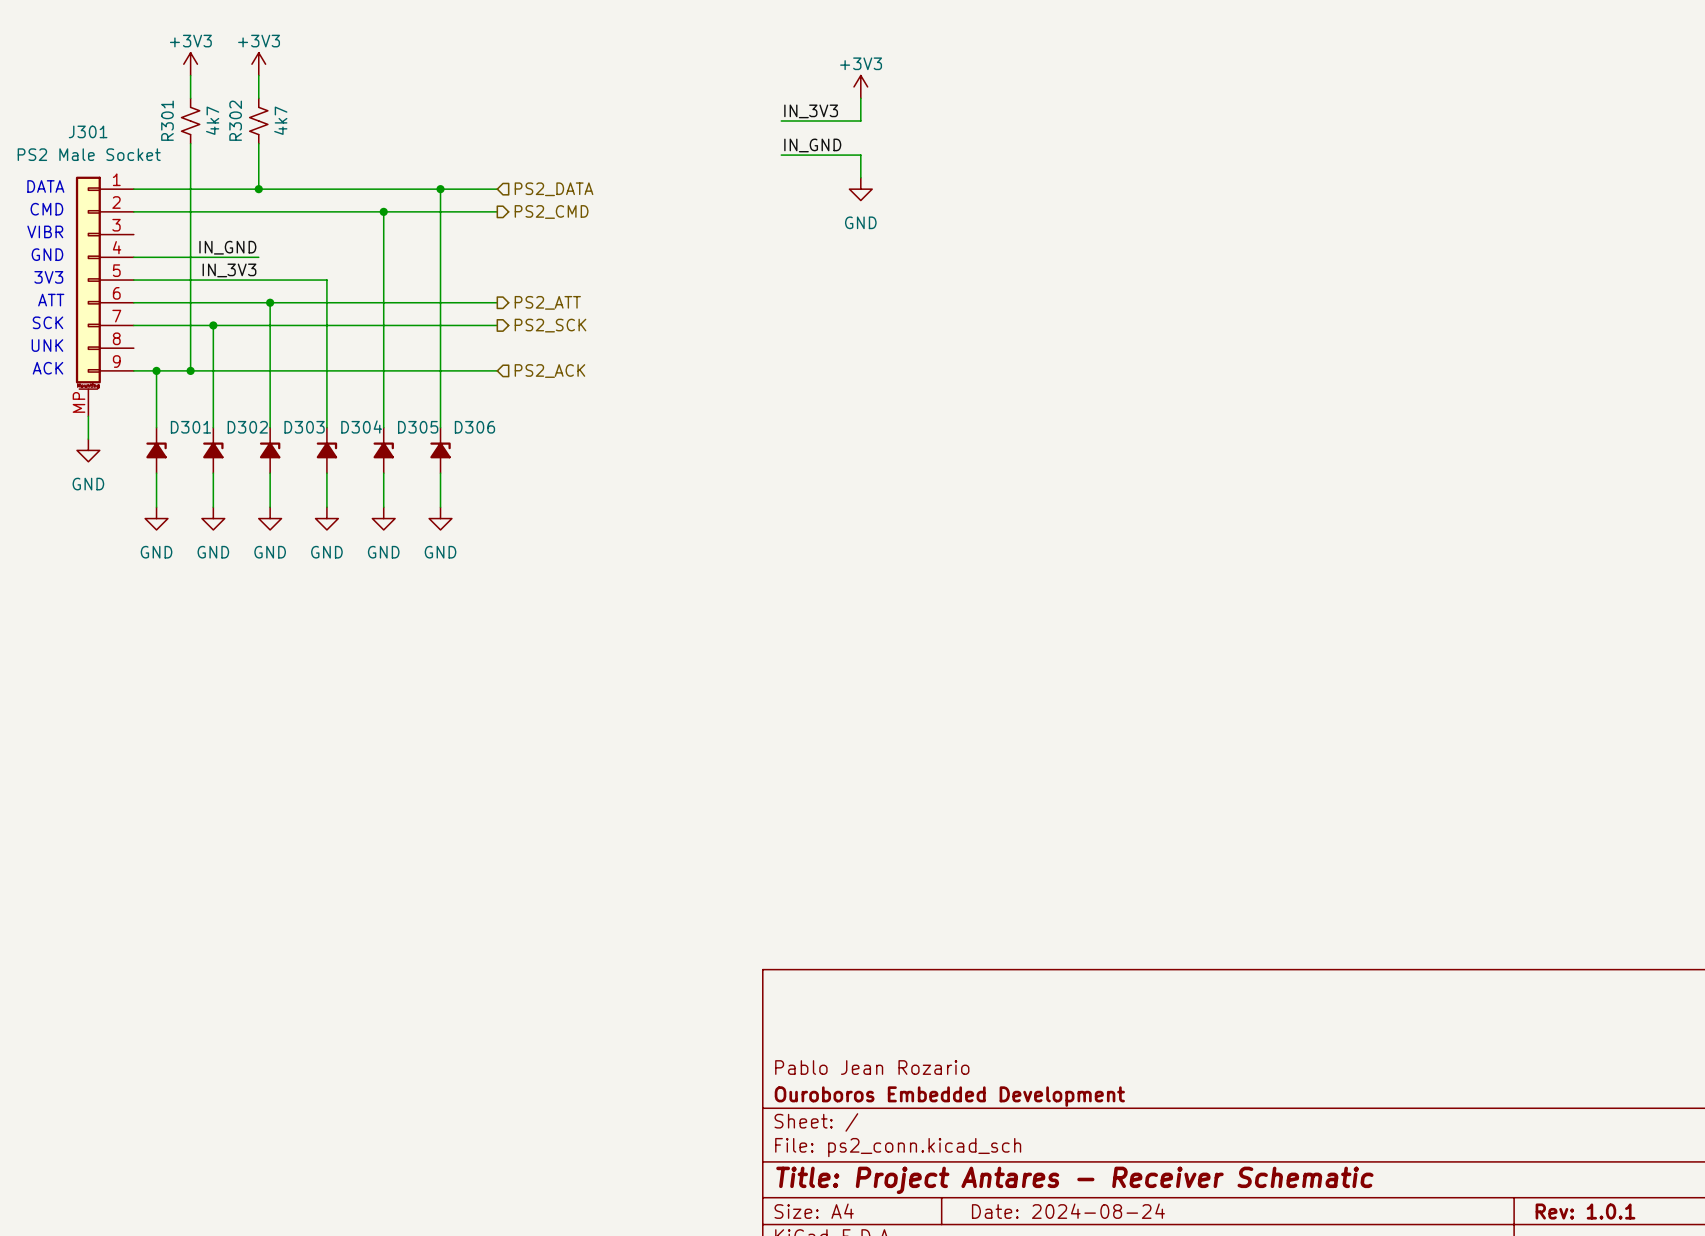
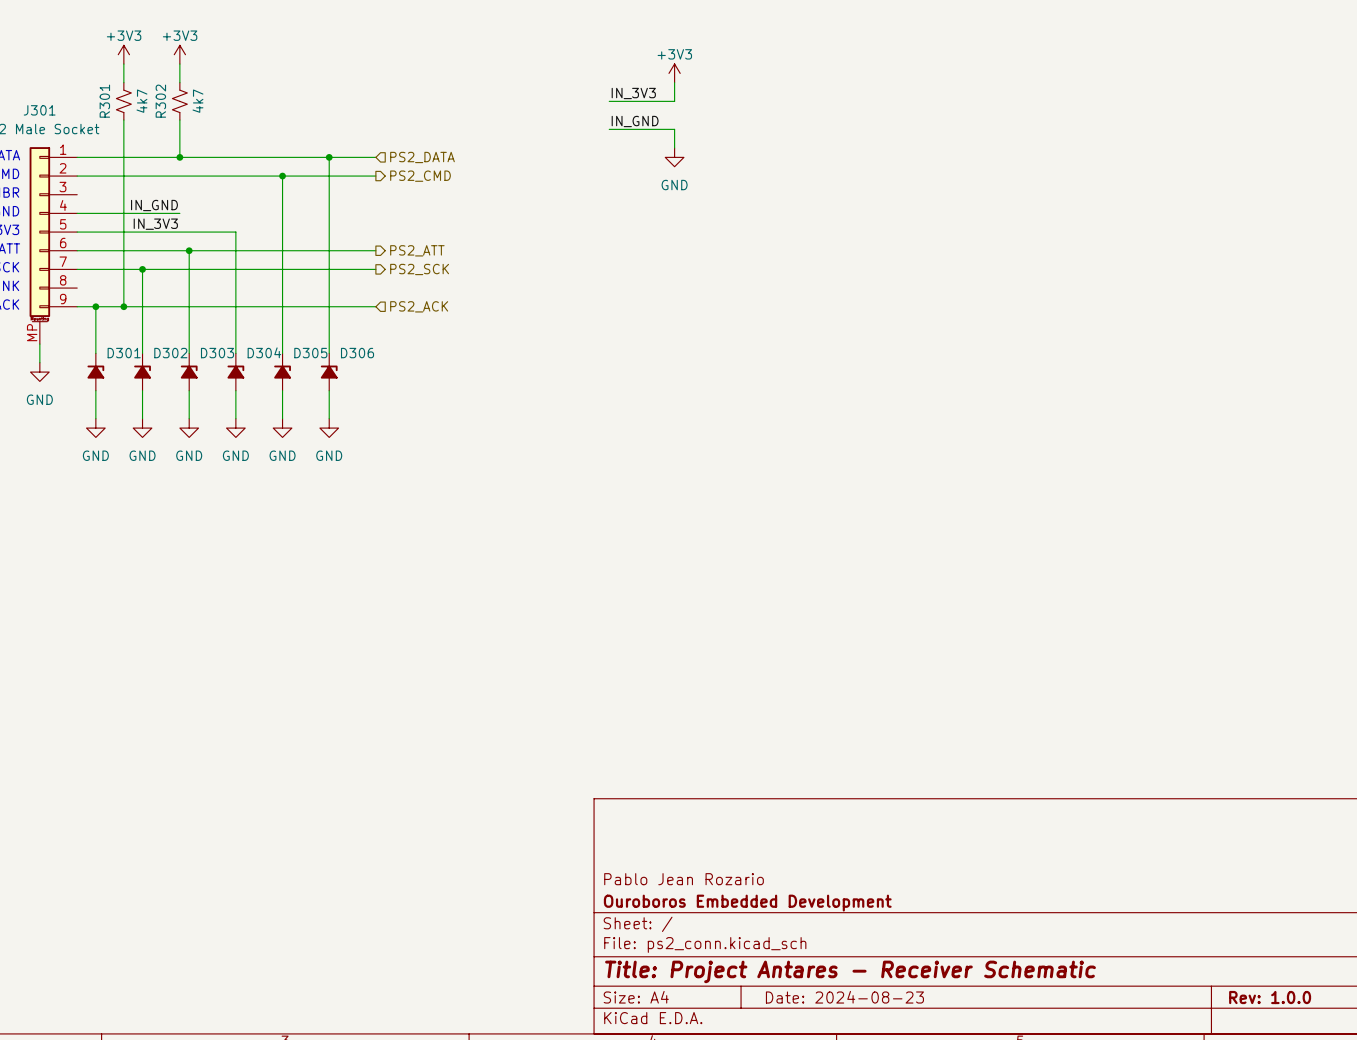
title block: Date: 2024-08-24 (1068, 1211) -> Date: 2024-08-23 (844, 997)
title block: Rev: 1.0.1 (1585, 1211) -> Rev: 1.0.0 (1270, 997)

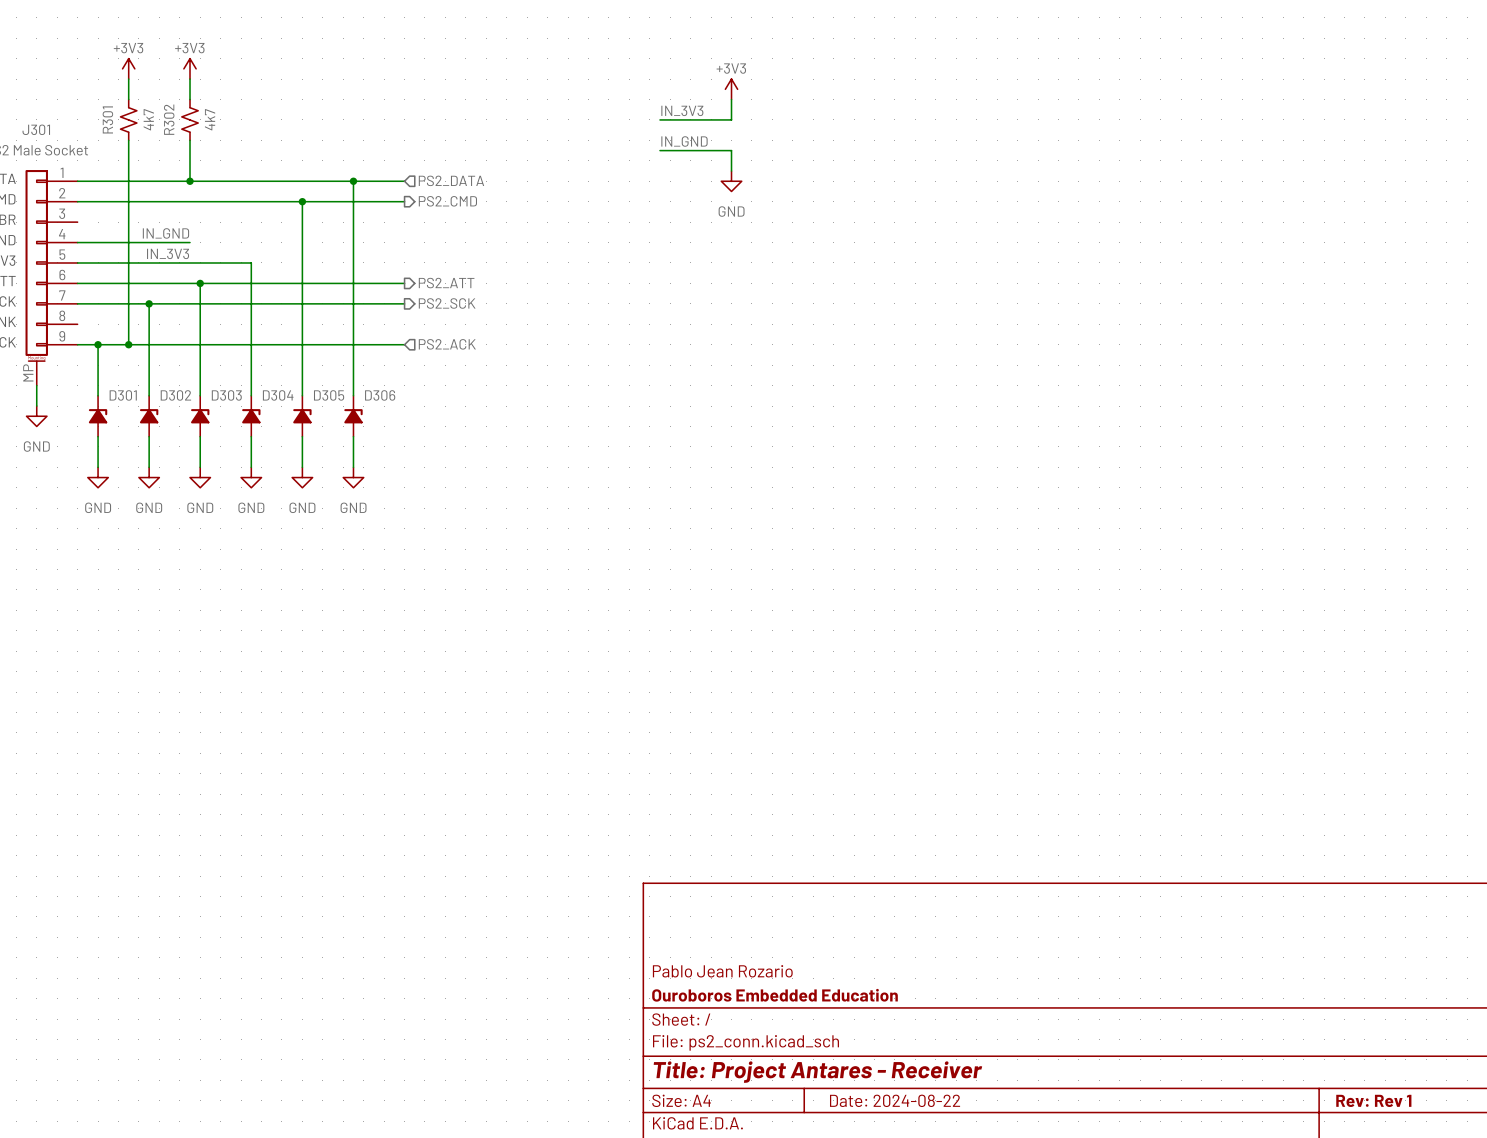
title block: Ouroboros Embedded Development (747, 903) -> Ouroboros Embedded Education (775, 995)
title block: Title: Project Antares - Receiver Schematic (850, 971) -> Title: Project Antares - Receiver (817, 1072)
title block: Date: 2024-08-23 (844, 997) -> Date: 2024-08-22 (895, 1100)
title block: Rev: 1.0.0 (1270, 997) -> Rev: Rev 1 (1373, 1100)

